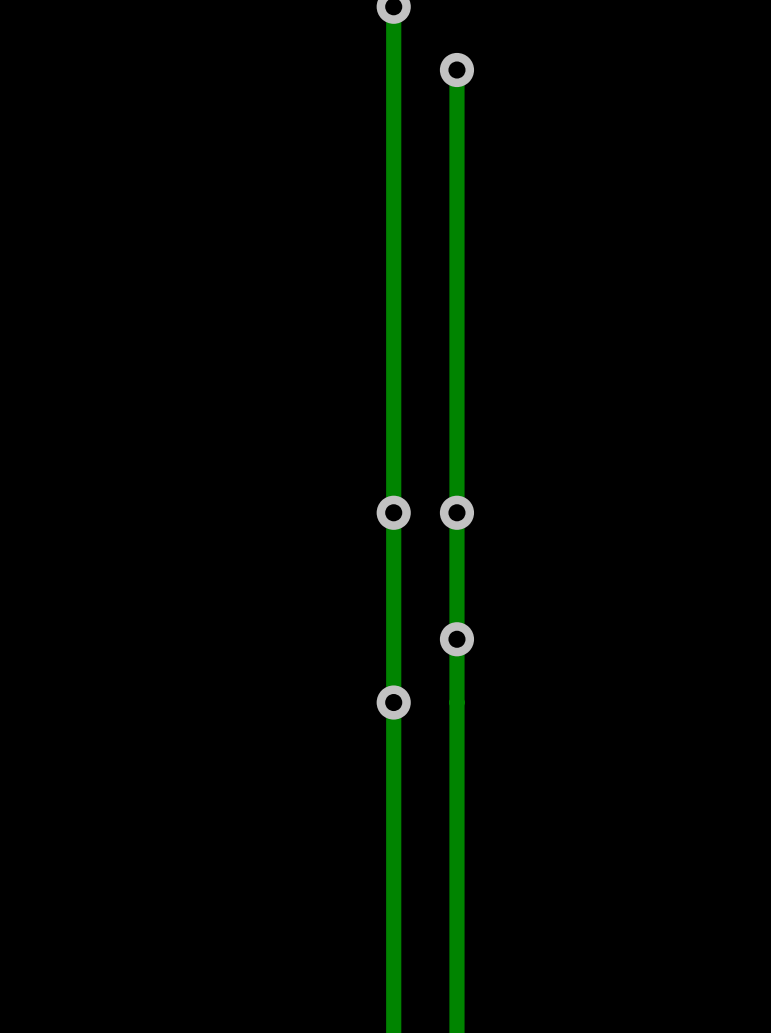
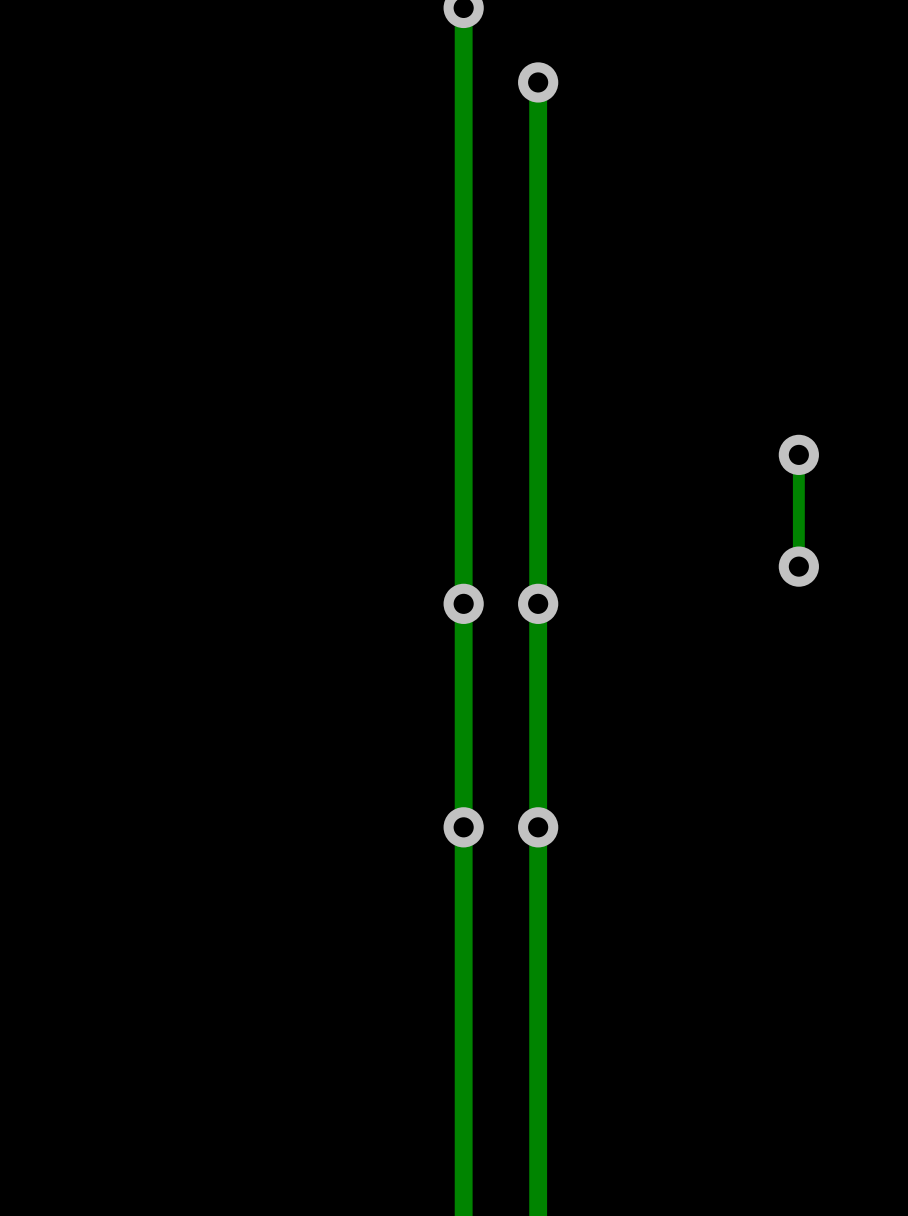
track: none -> (798, 454) (798, 566)
via: none -> (798, 454)
via: none -> (798, 566)
via position: (456, 639) -> (538, 827)

